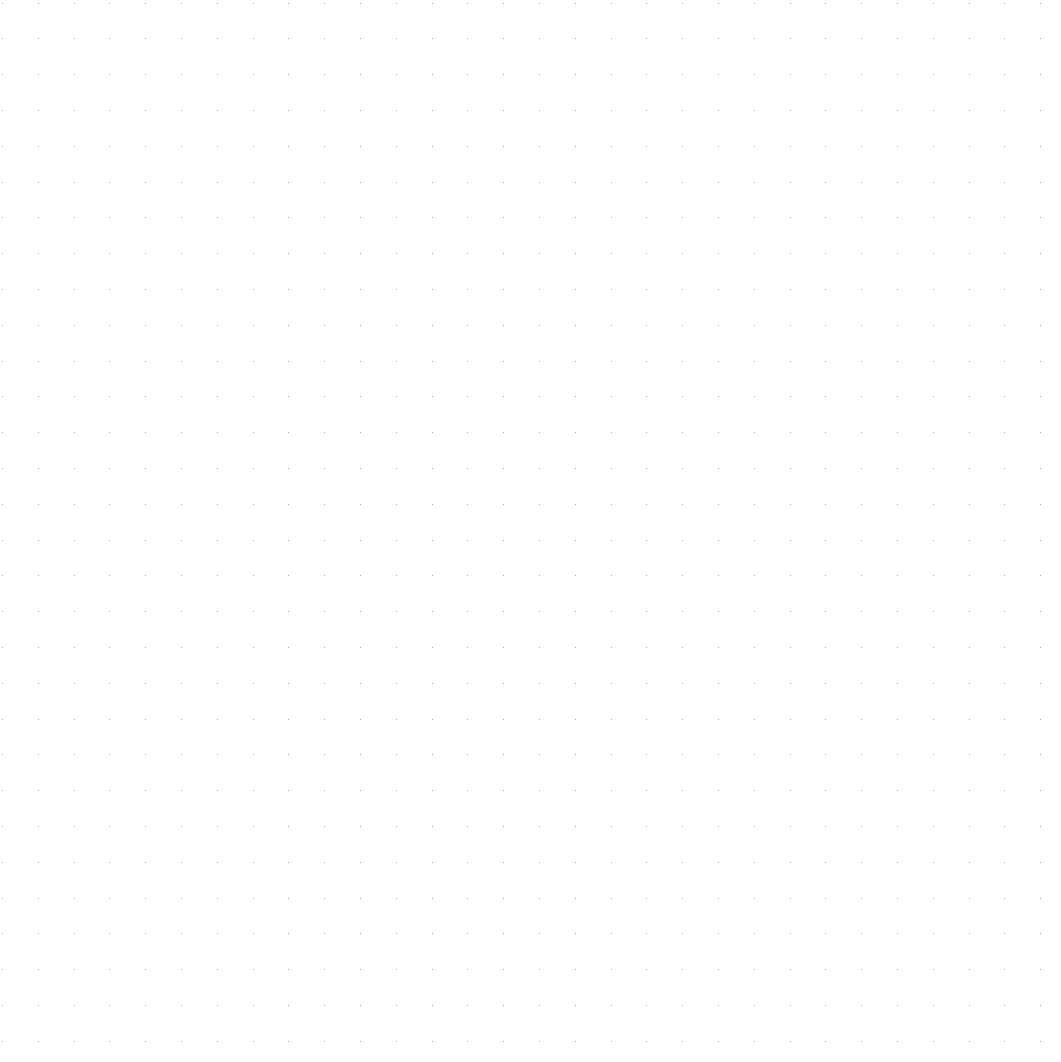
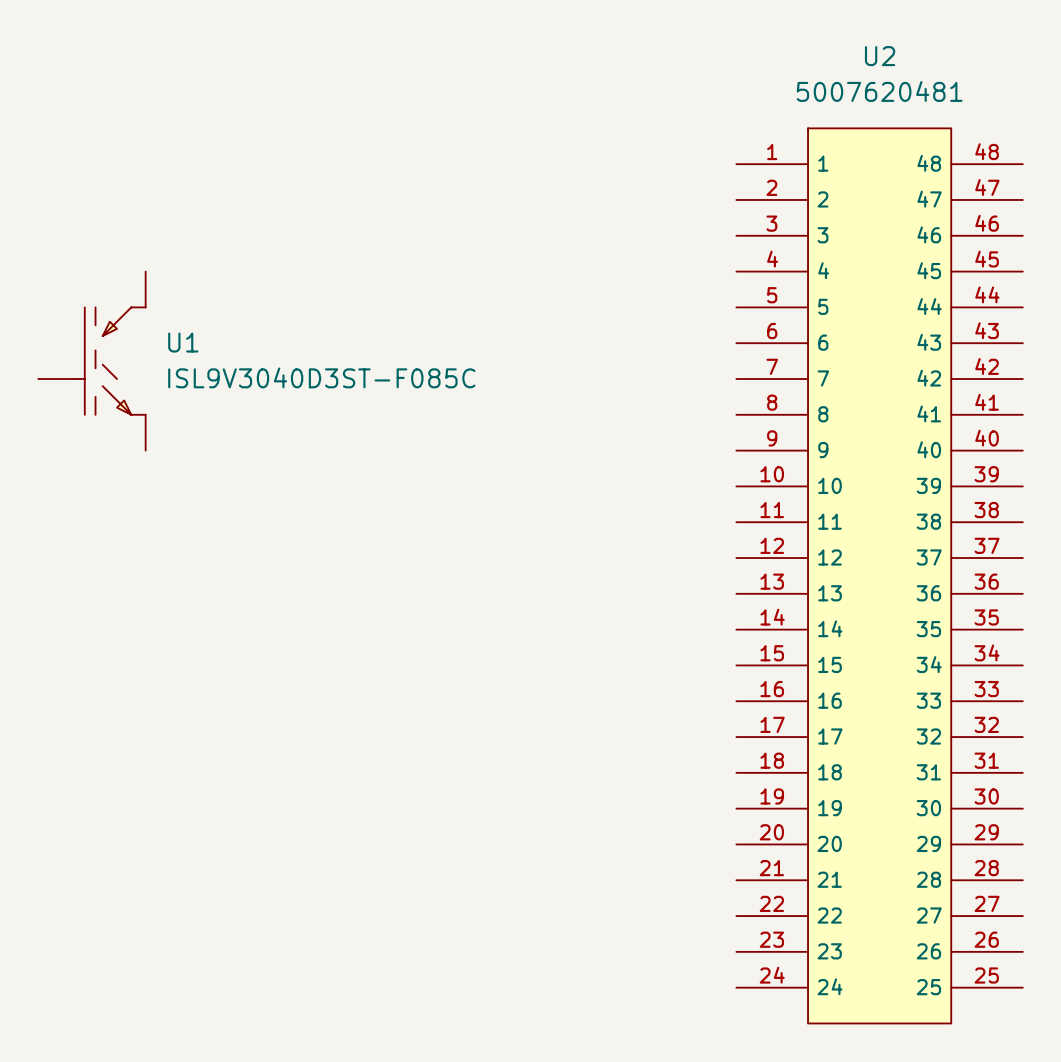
U1: none -> ISL9V3040D3ST-F085C (91, 361)
U2: none -> 5007620481 (879, 575)

